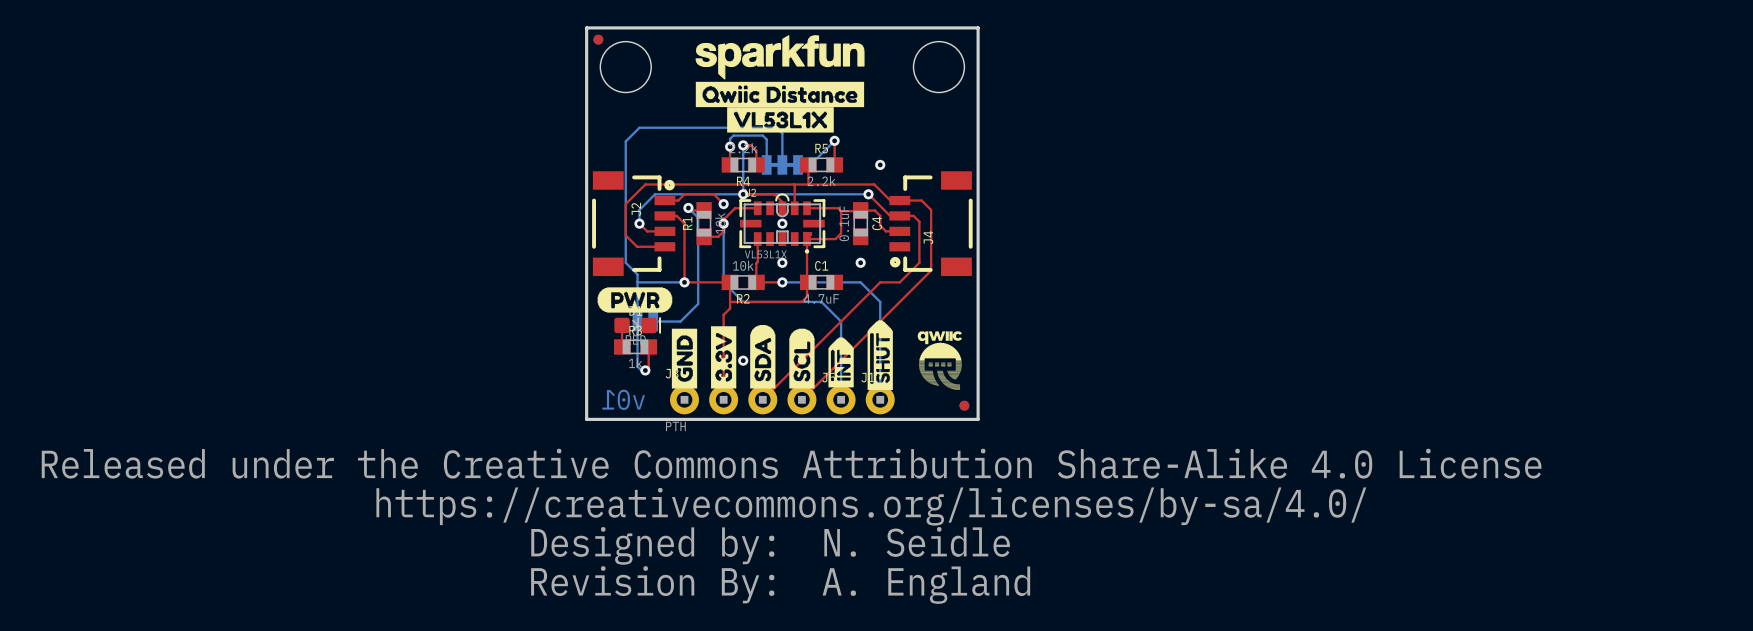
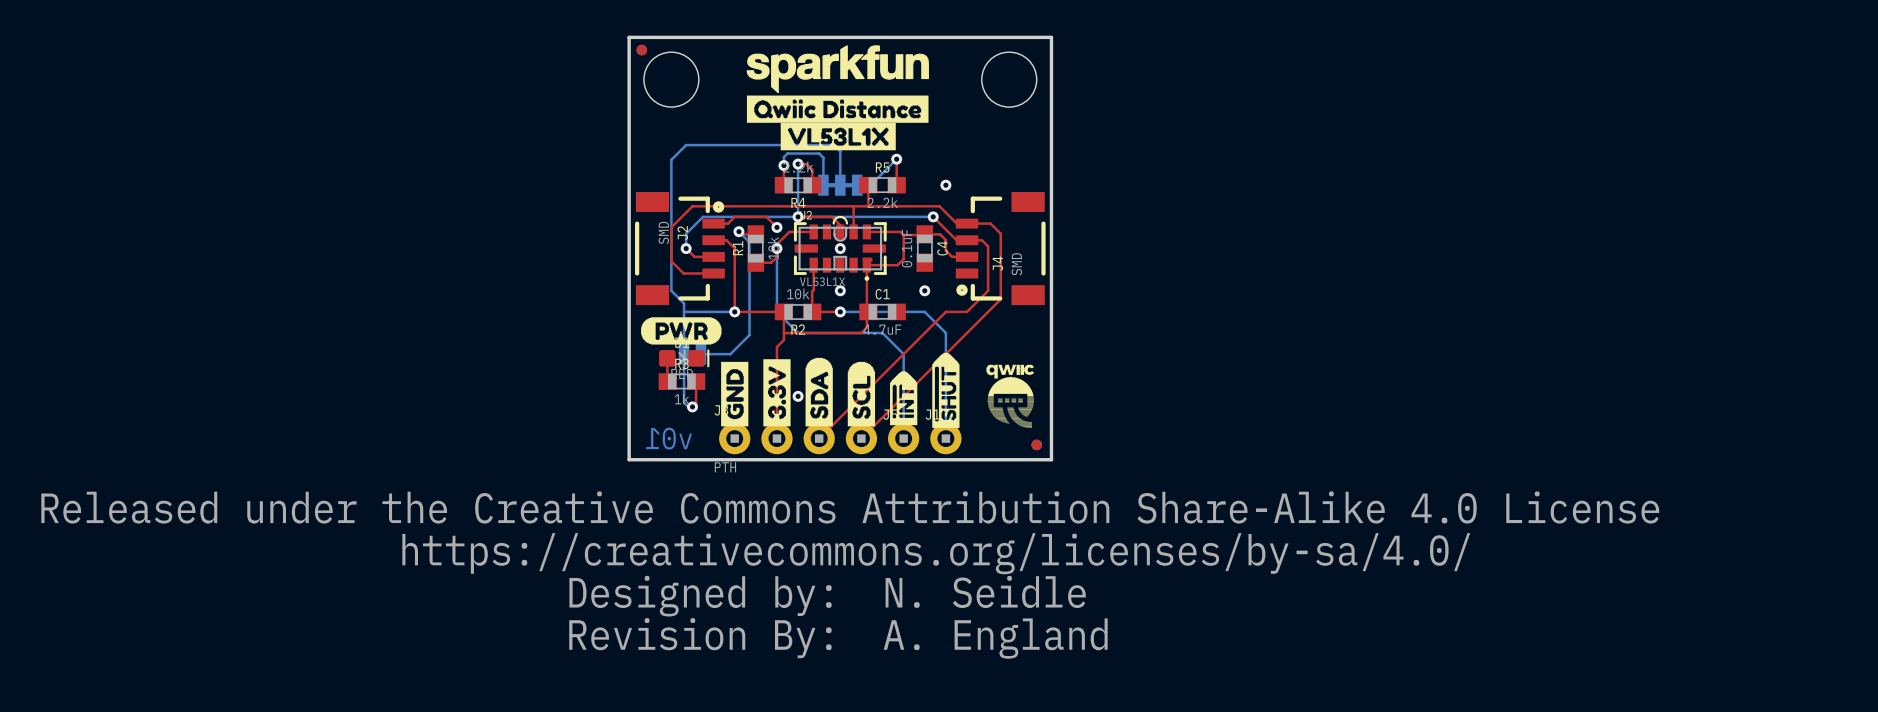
J2 value: none -> SMD (663, 232)
J4 value: none -> SMD (1016, 264)

